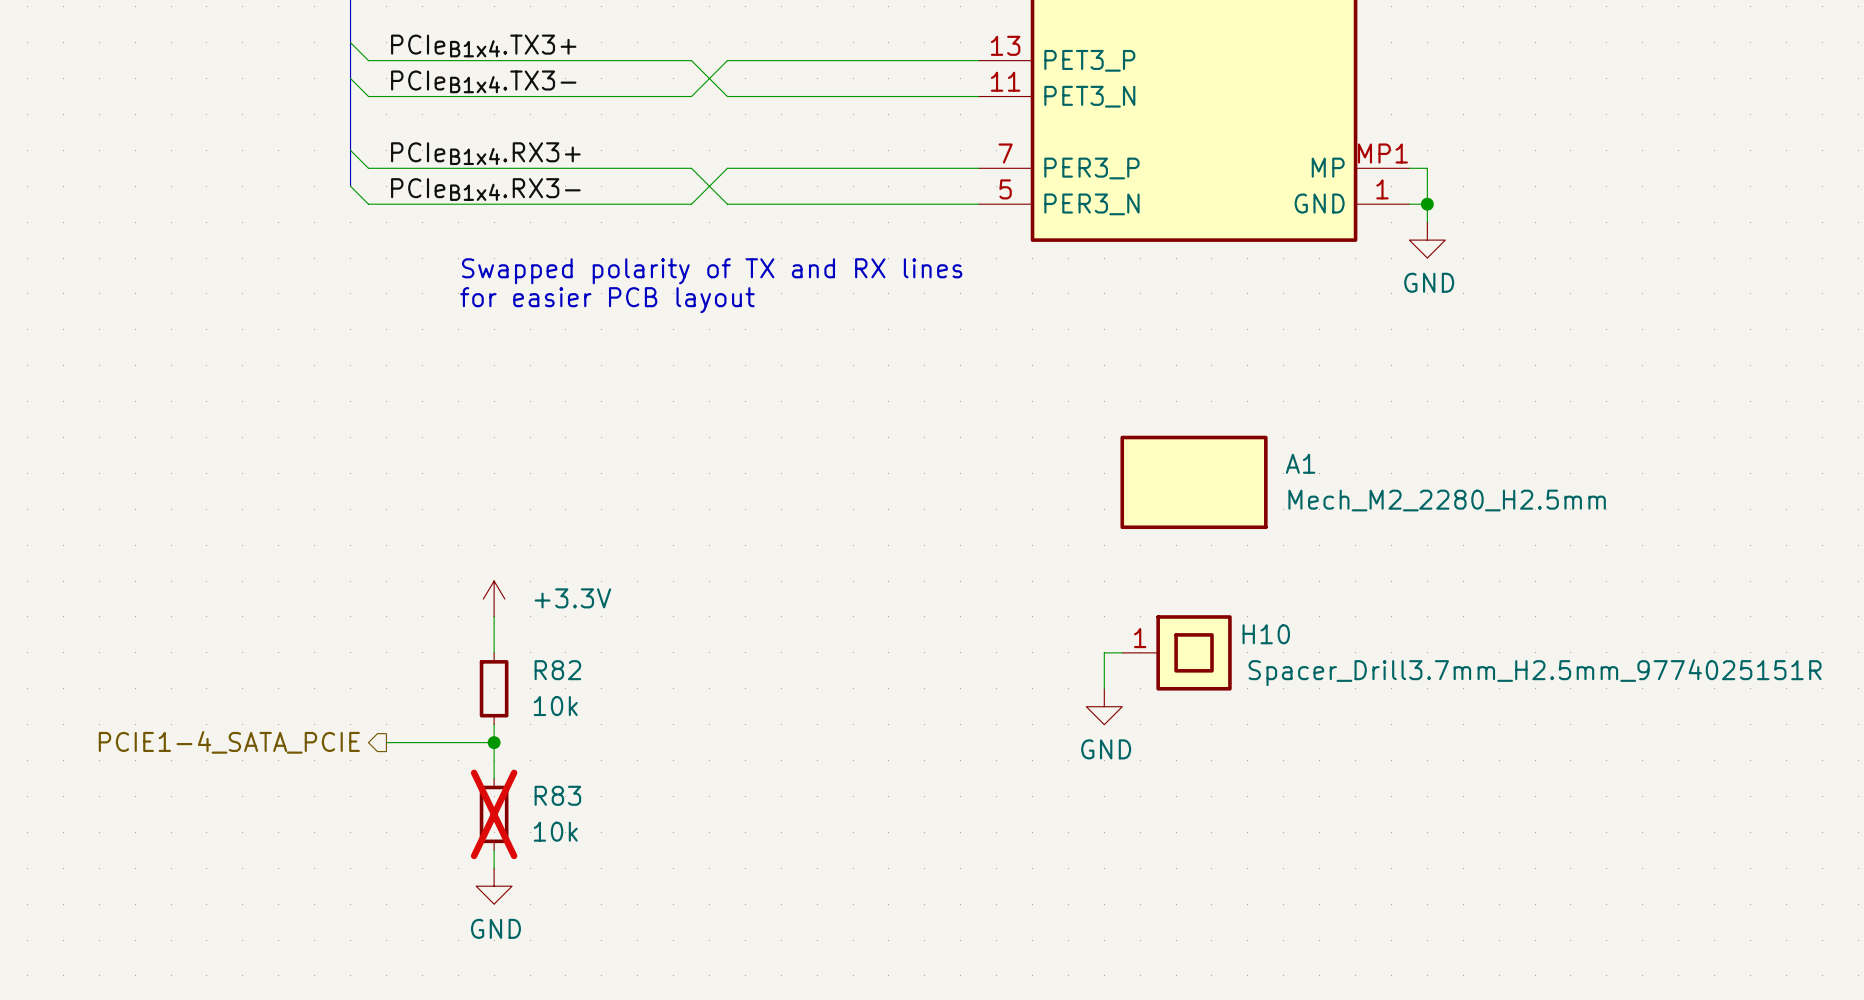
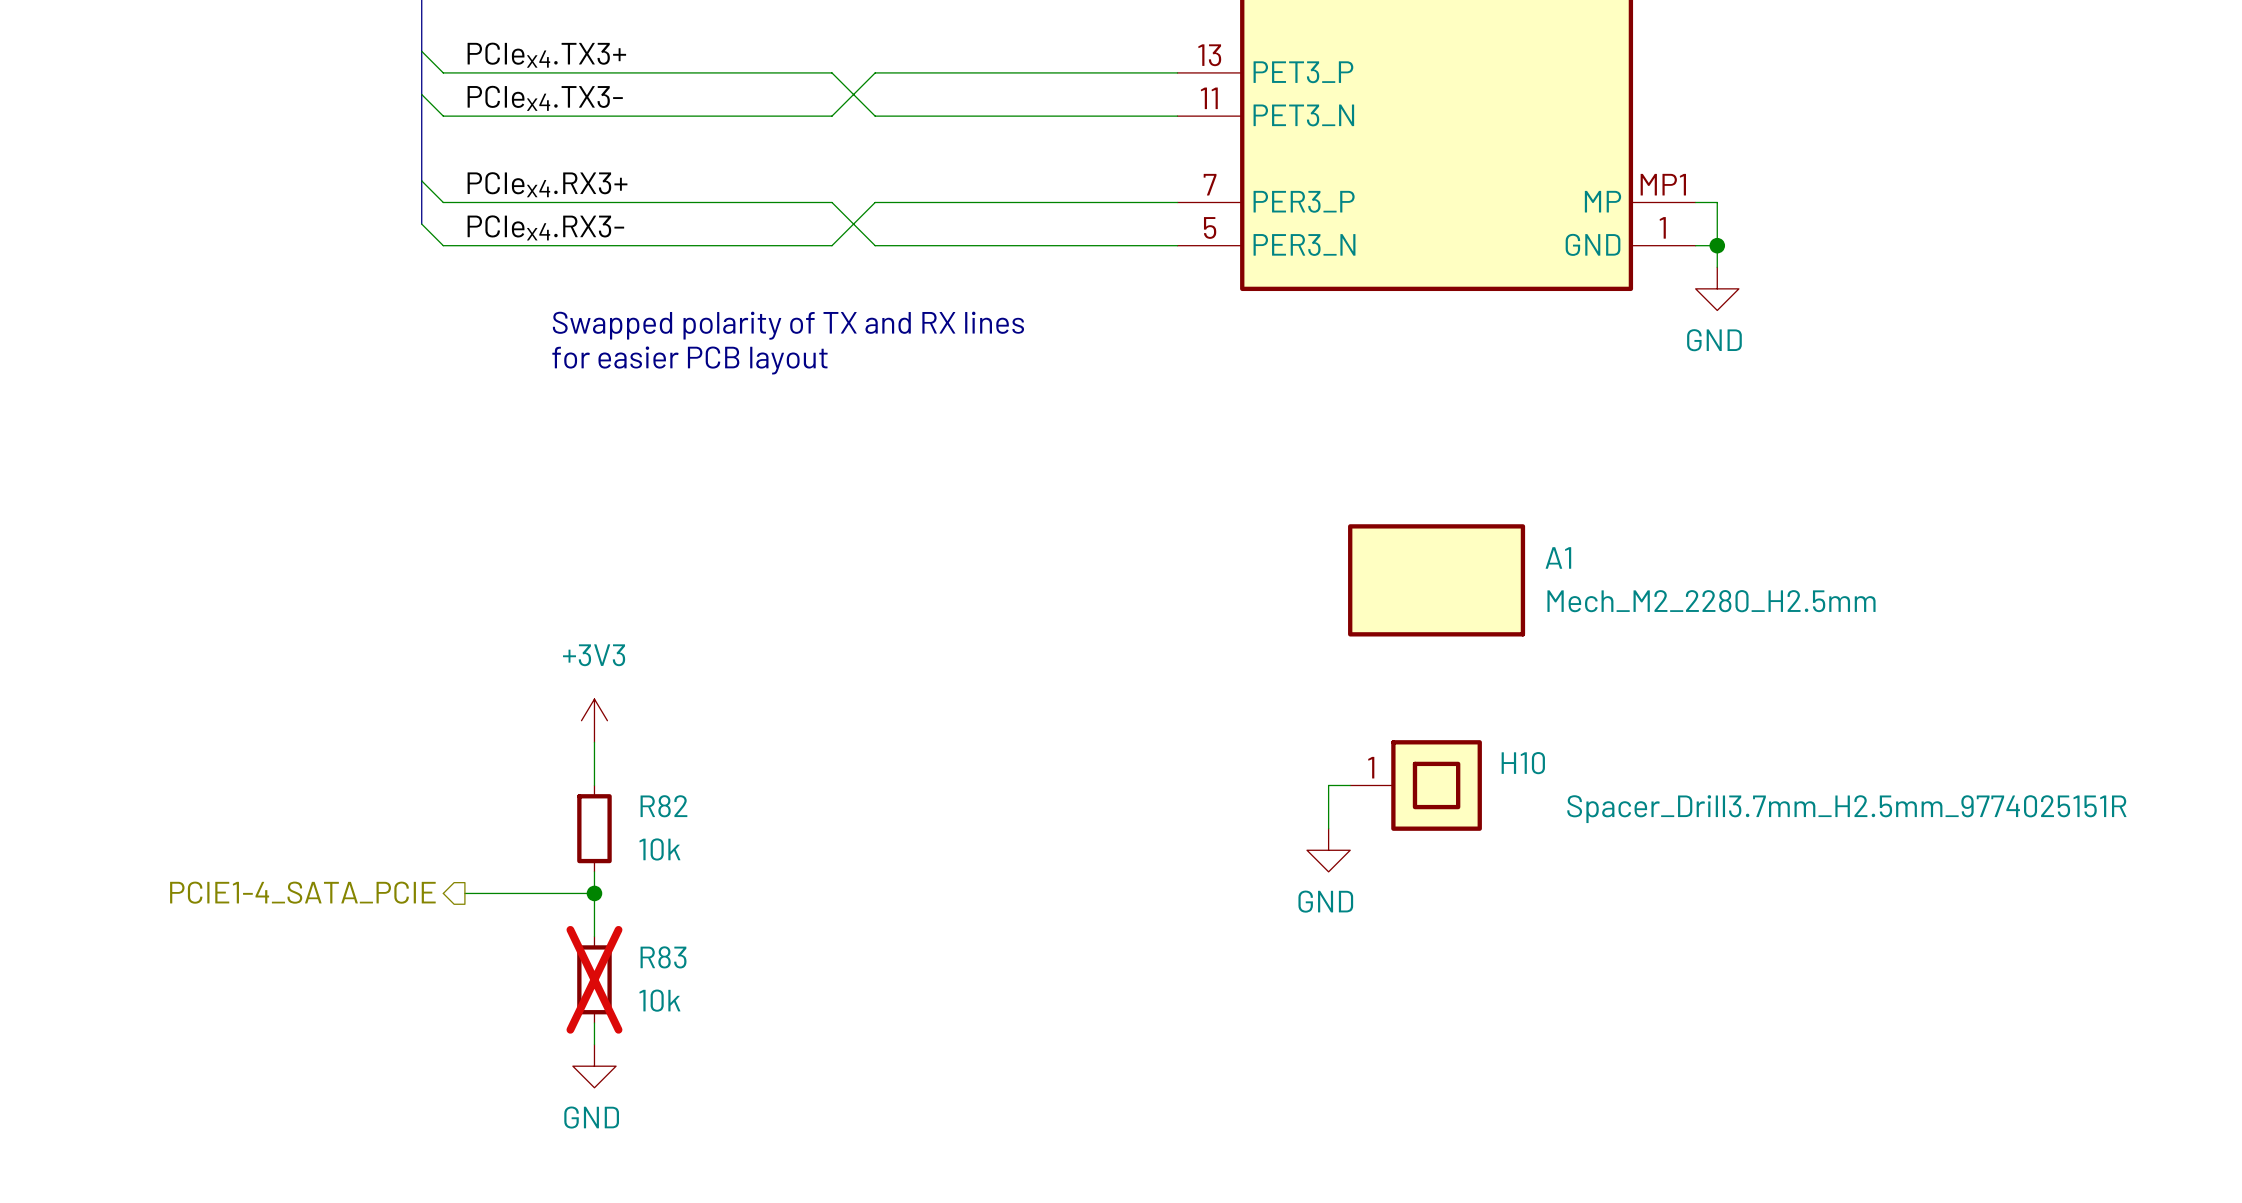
label: PCIeB1x4.TX3+ (483, 45) -> PCIex4.TX3+ (546, 55)
label: PCIeB1x4.TX3- (483, 81) -> PCIex4.TX3- (545, 98)
label: PCIeB1x4.RX3+ (485, 153) -> PCIex4.RX3+ (547, 184)
label: PCIeB1x4.RX3- (485, 189) -> PCIex4.RX3- (545, 227)
power symbol: +3.3V (494, 599) -> +3V3 (594, 720)

